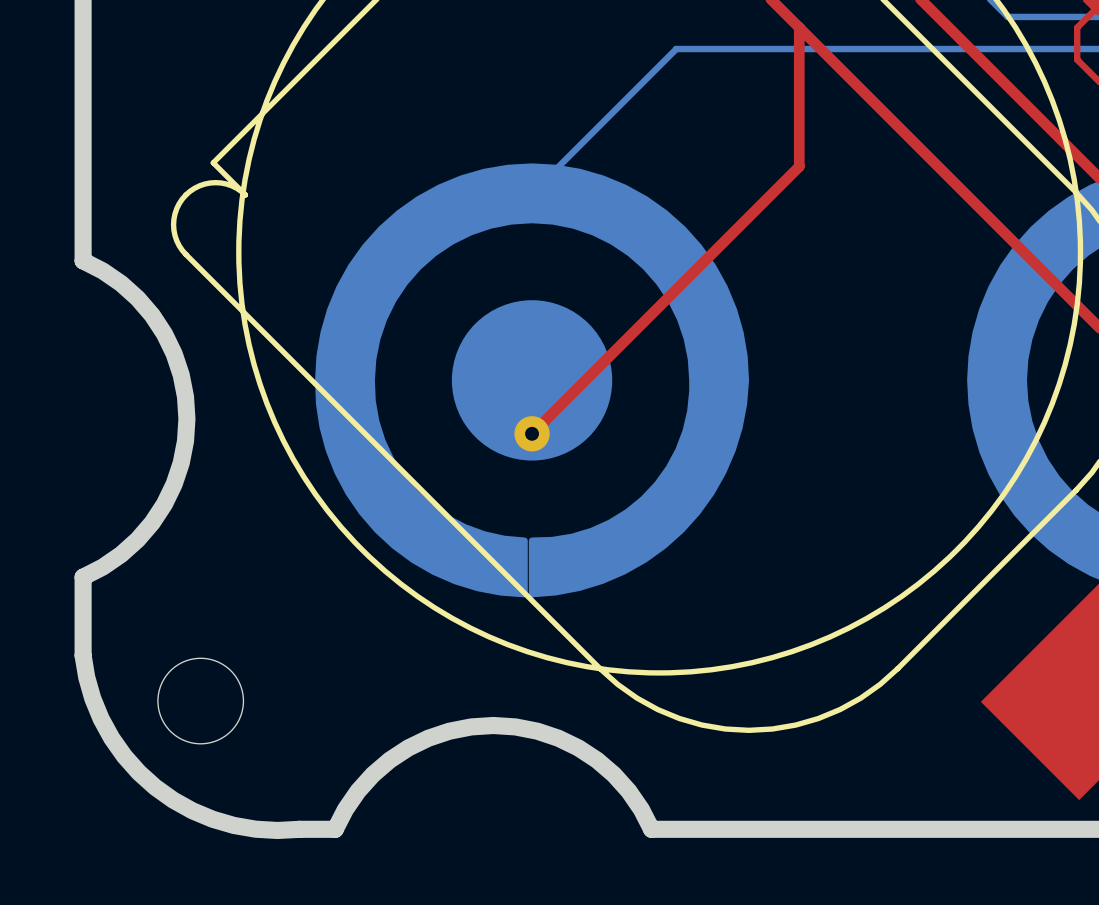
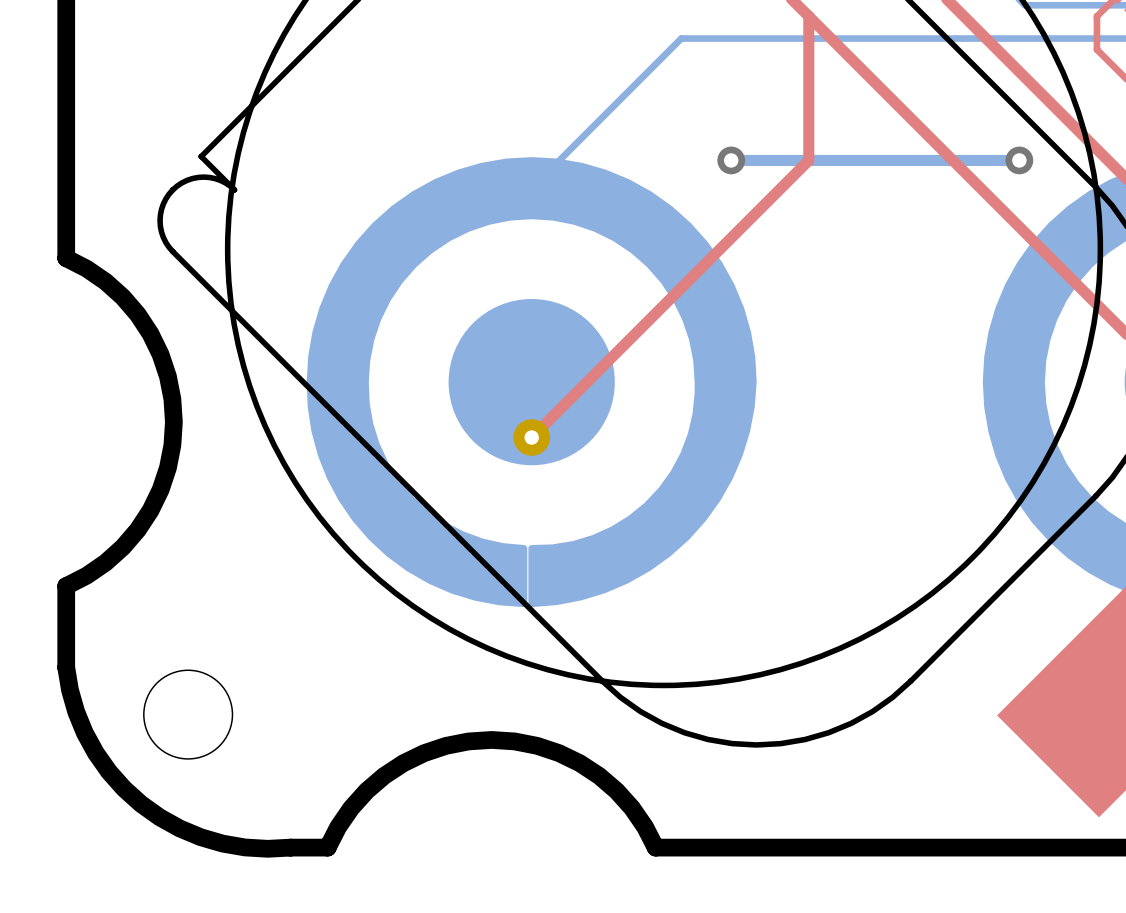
bottom track: none -> (731, 160) (1019, 160)
via: none -> (731, 160)
via: none -> (1019, 160)

